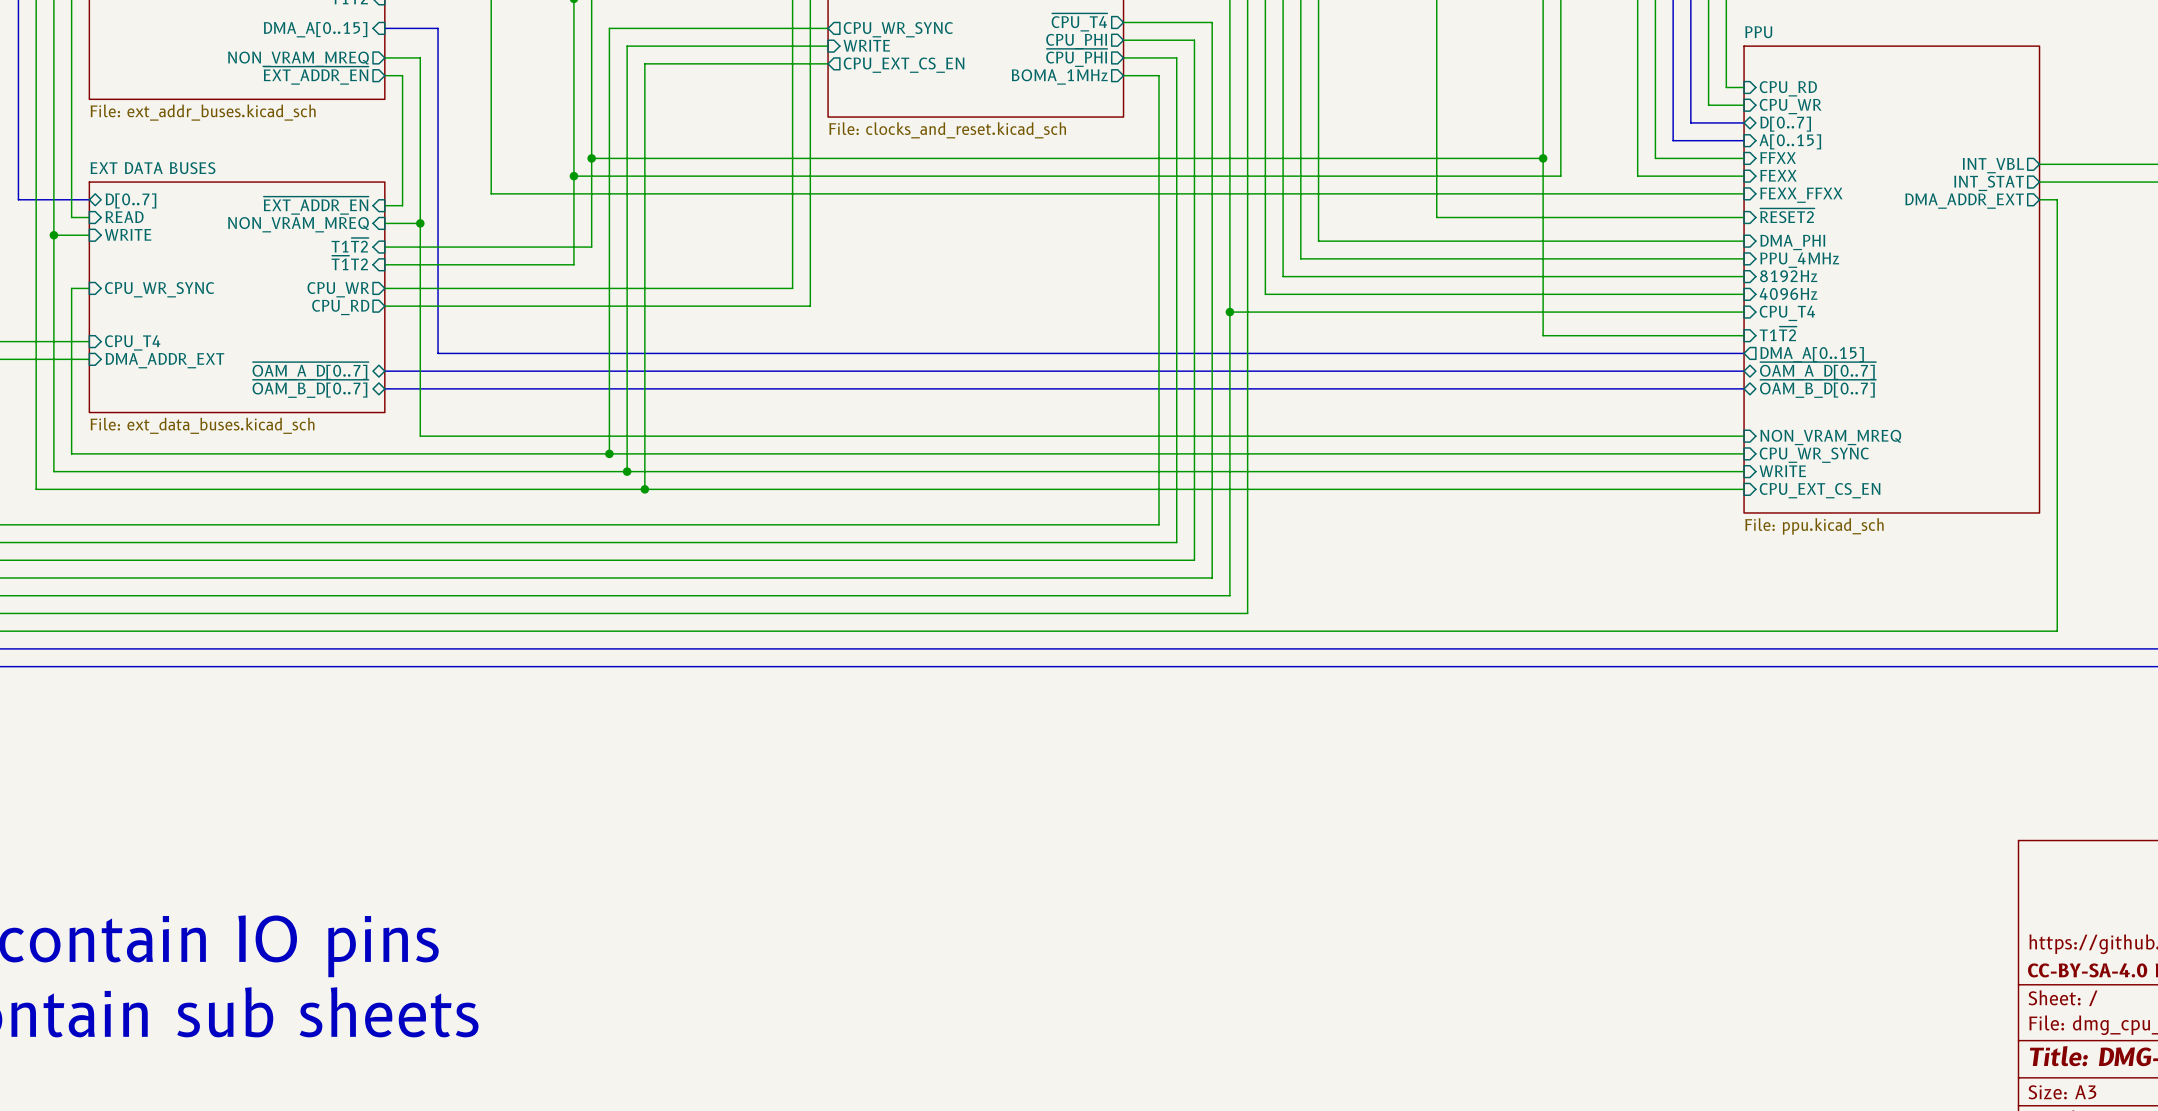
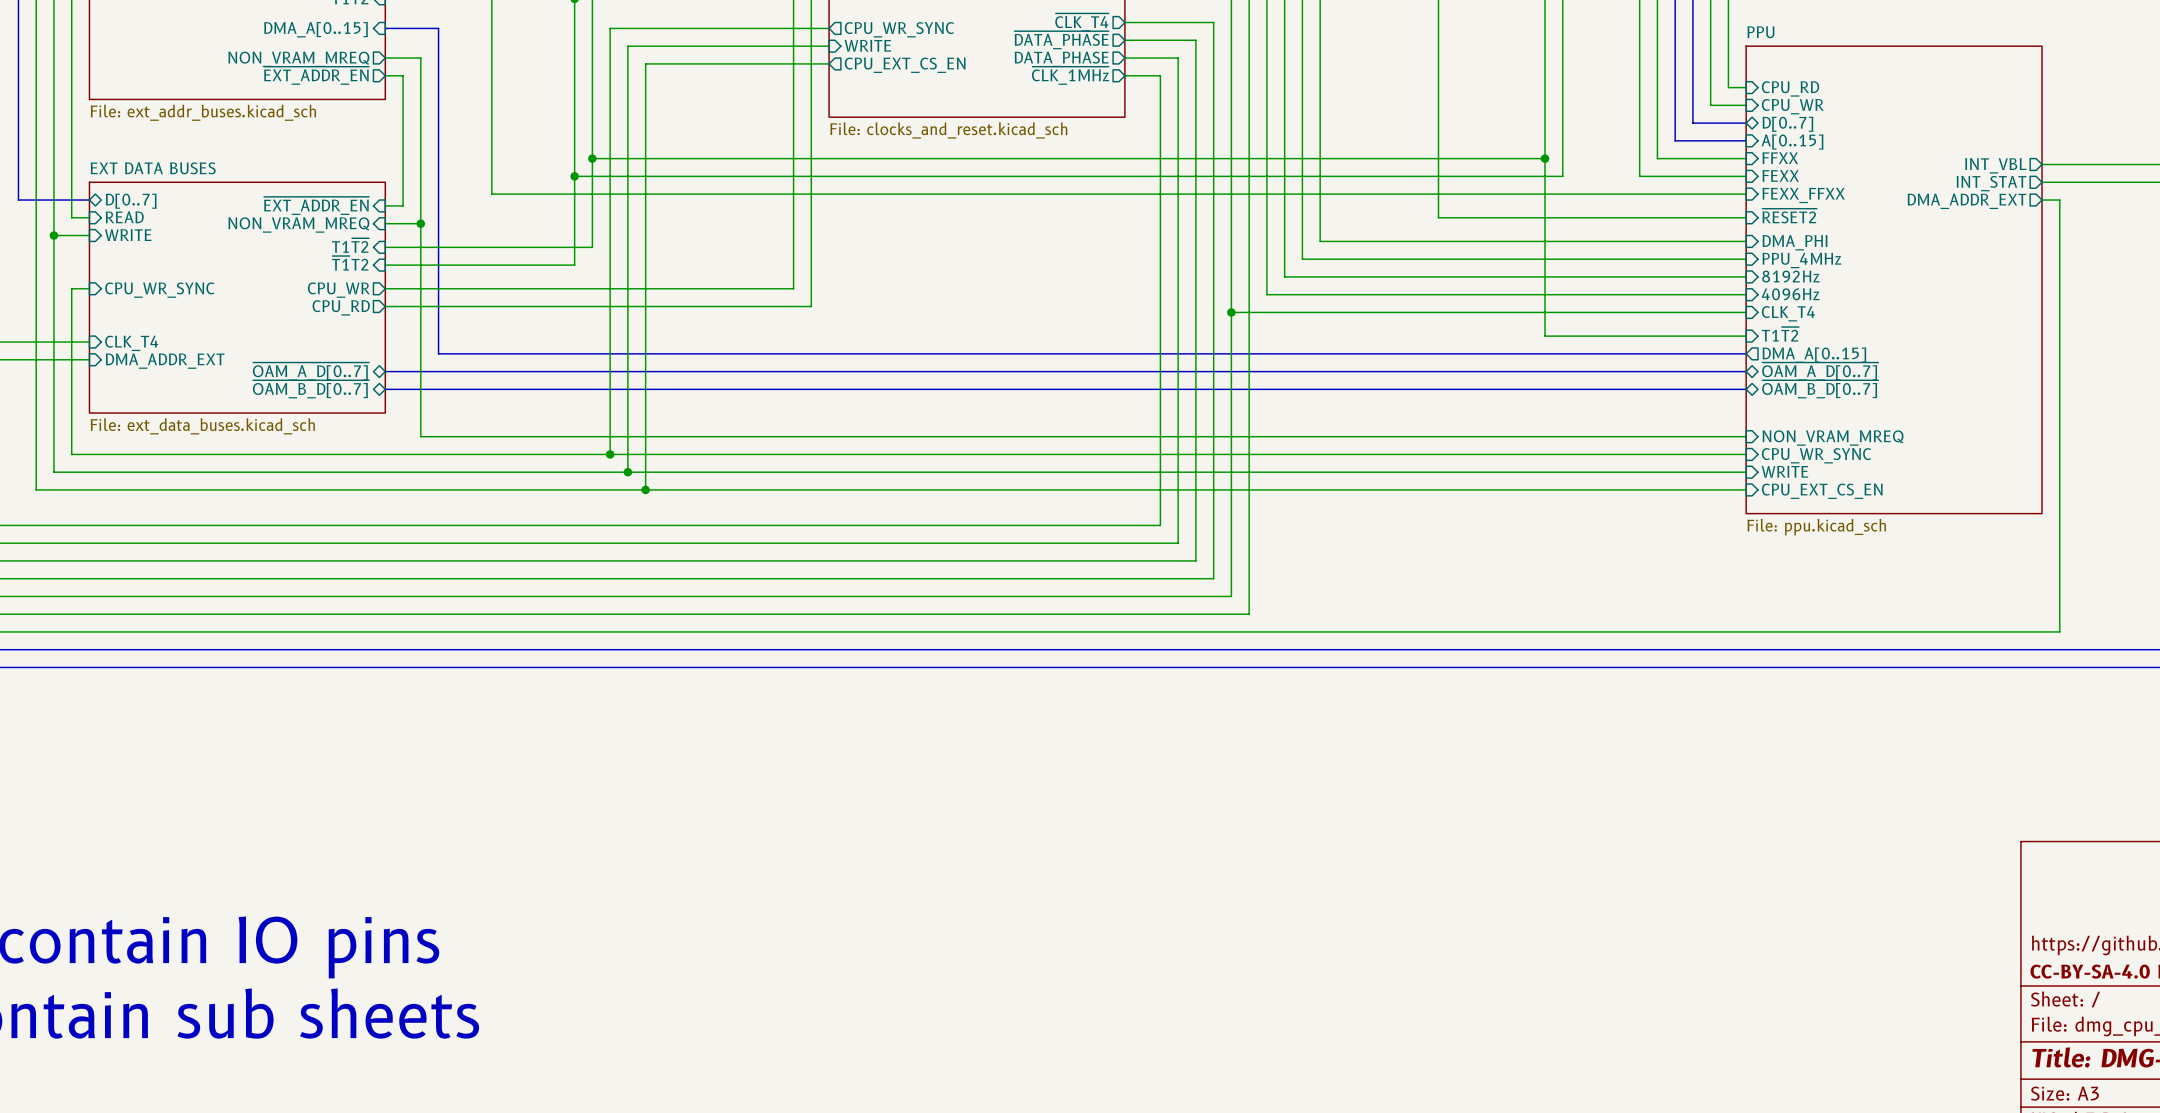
sheet pin: ~{CPU_T4} (1079, 22) -> ~{CLK_T4} (1081, 22)
sheet pin: CPU_PHI (1076, 41) -> ~{DATA_PHASE} (1061, 40)
sheet pin: ~{CPU_PHI} (1076, 57) -> DATA_PHASE (1061, 59)
sheet pin: BOMA_1MHz (1059, 77) -> ~{CLK_1MHz} (1070, 75)
sheet pin: CPU_T4 (1787, 313) -> CLK_T4 (1788, 313)
sheet pin: CPU_T4 (132, 342) -> CLK_T4 (131, 343)

